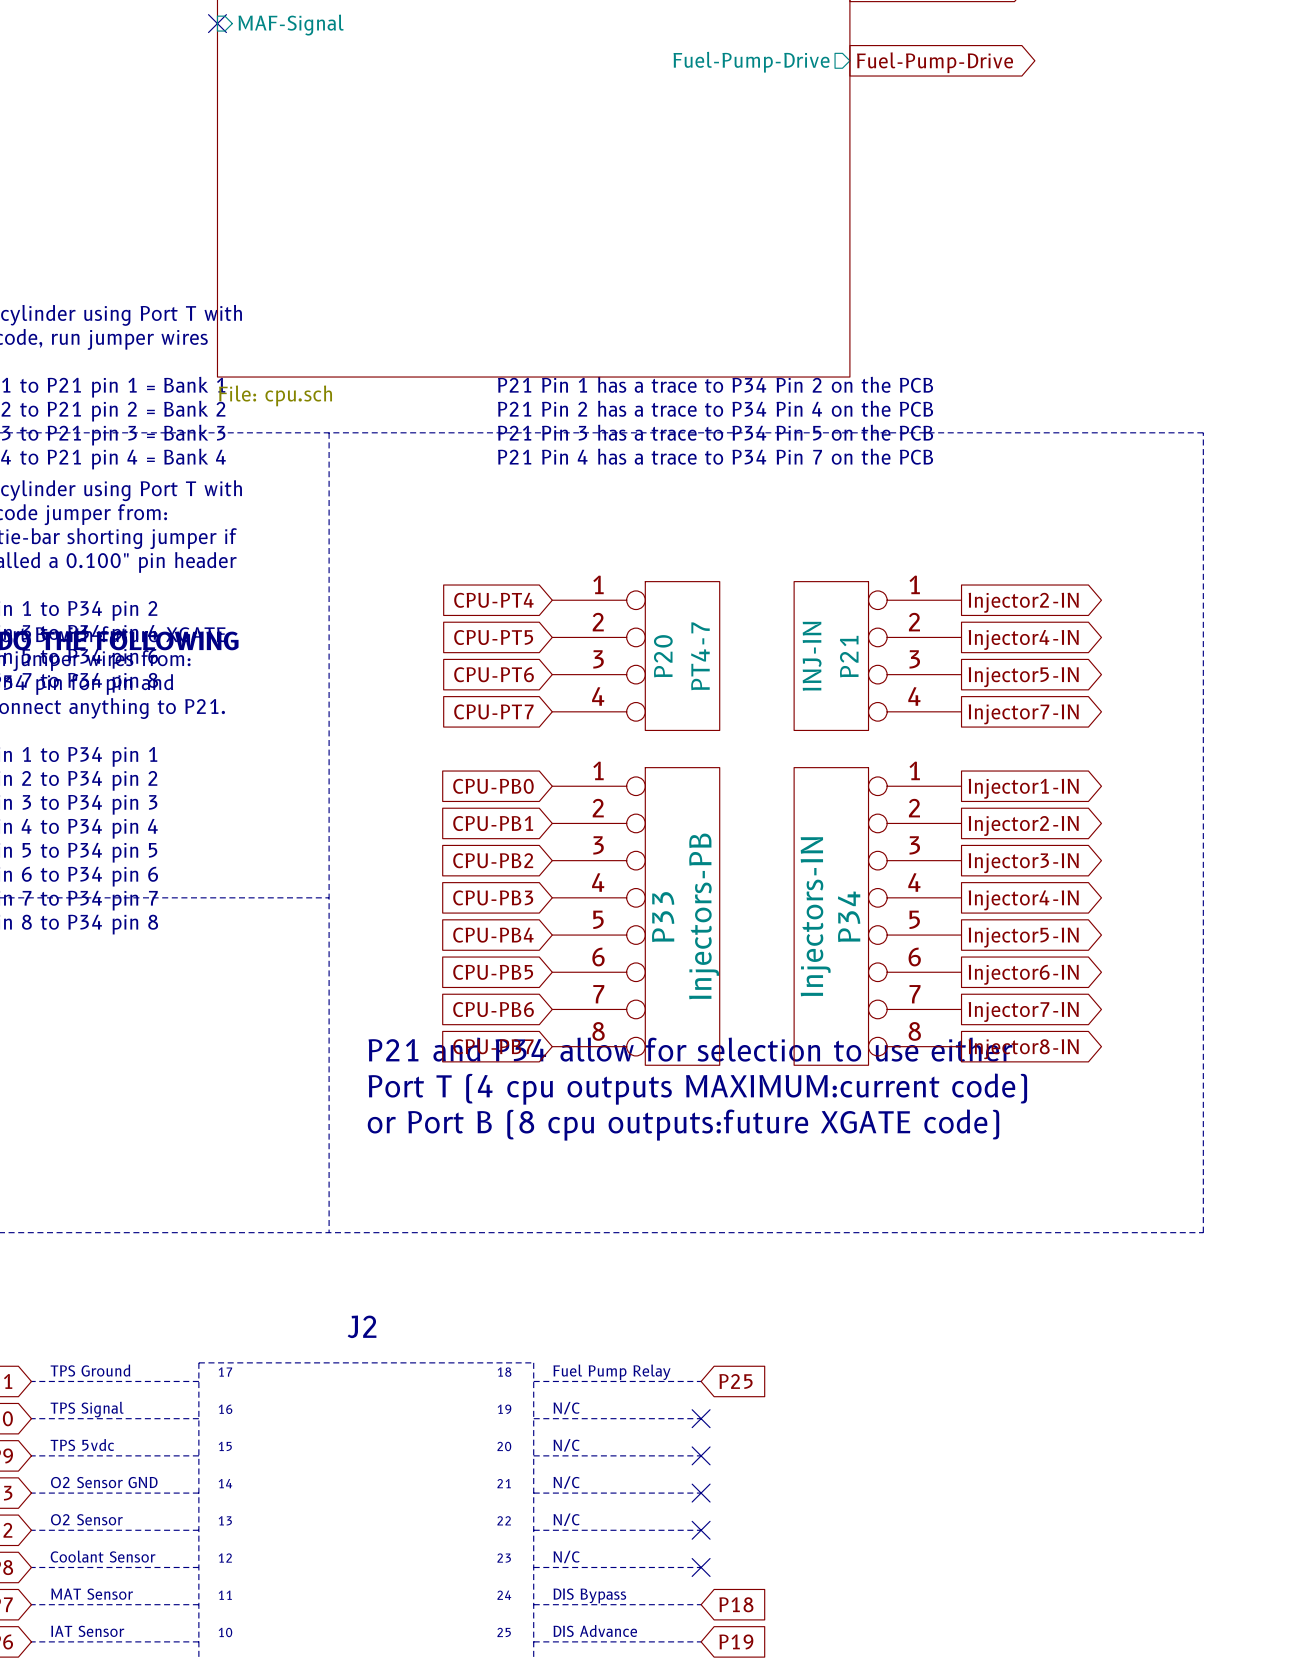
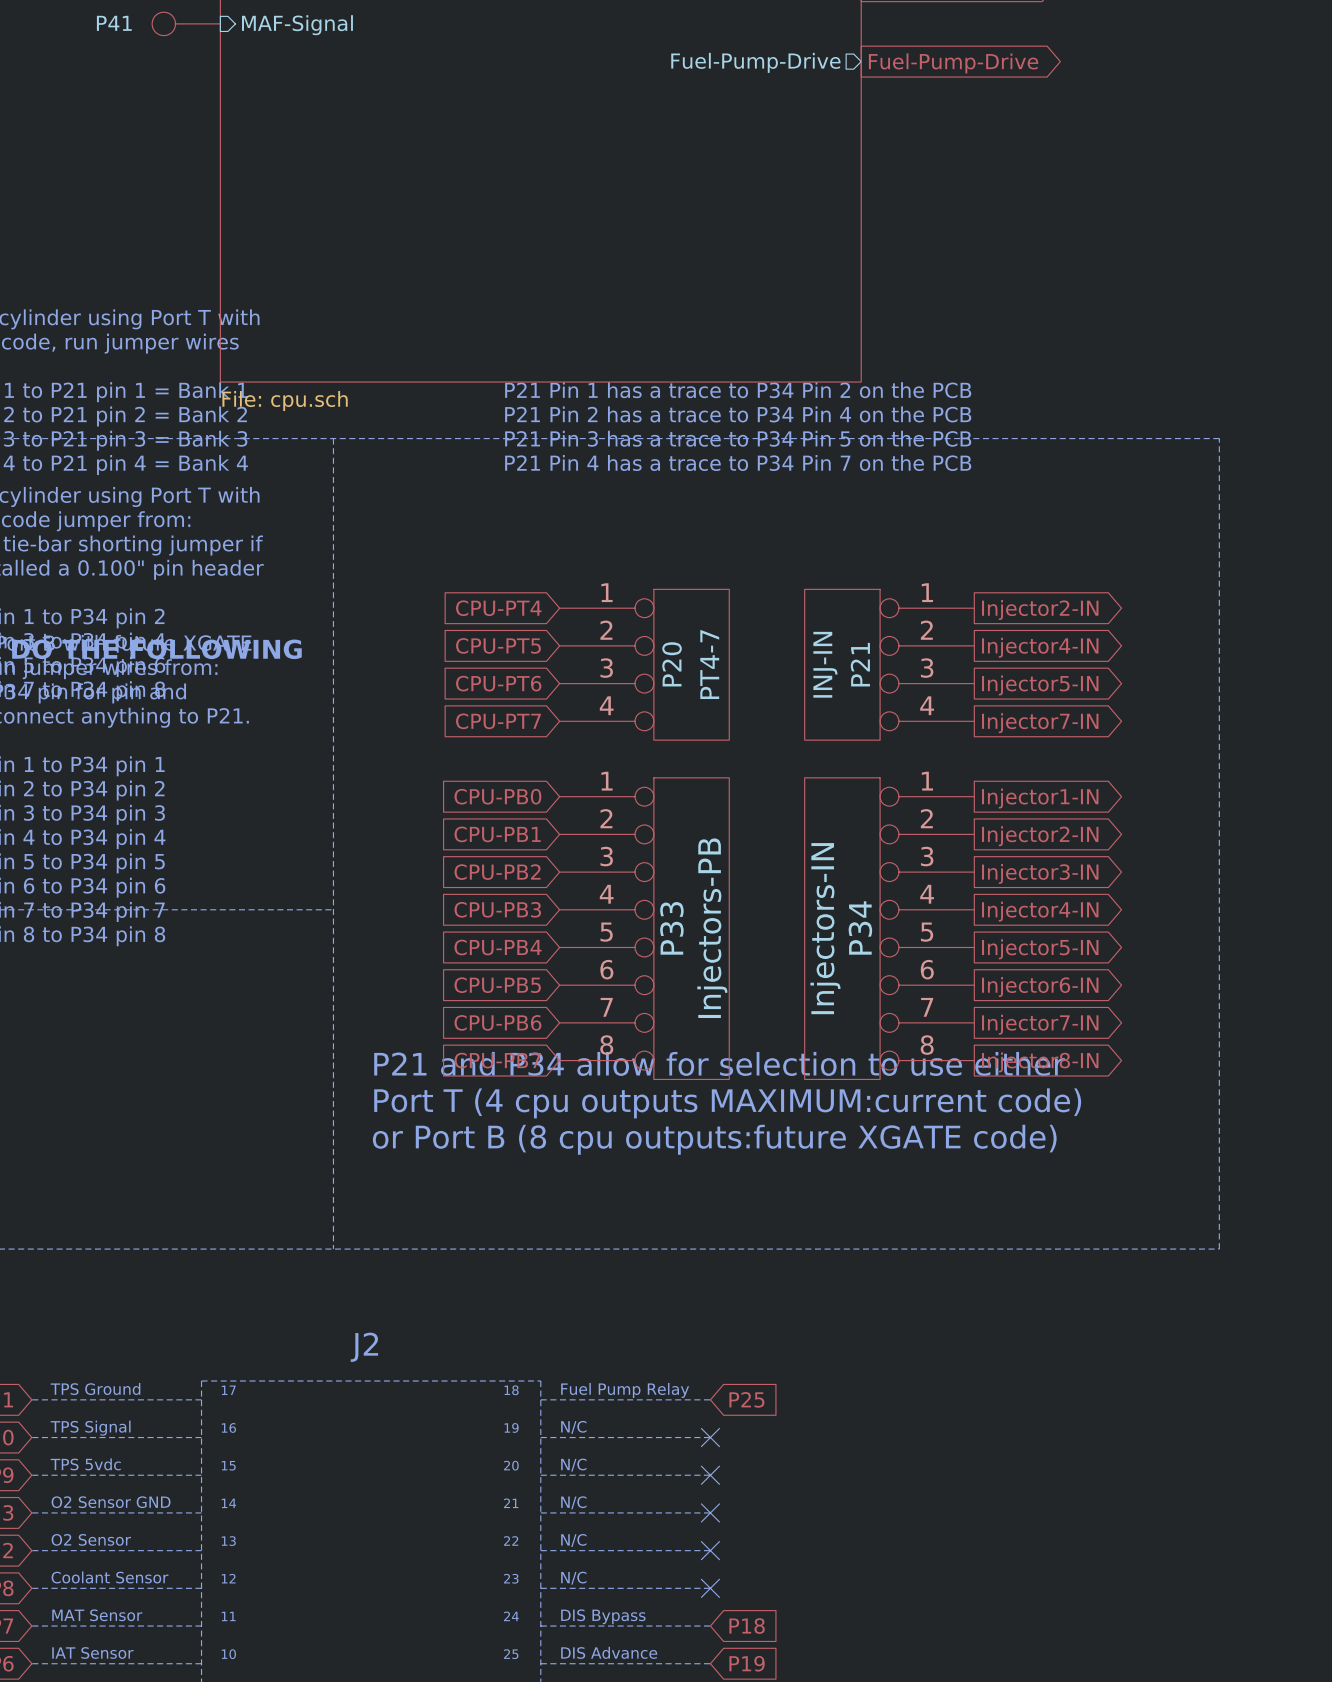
P41: none -> (186, 23)
no-connect mark: (217, 23) -> none

